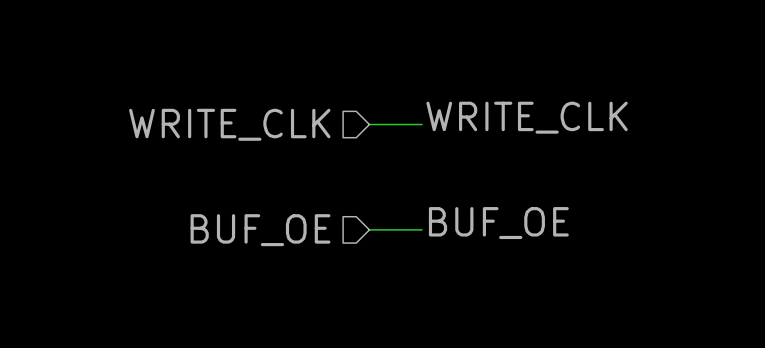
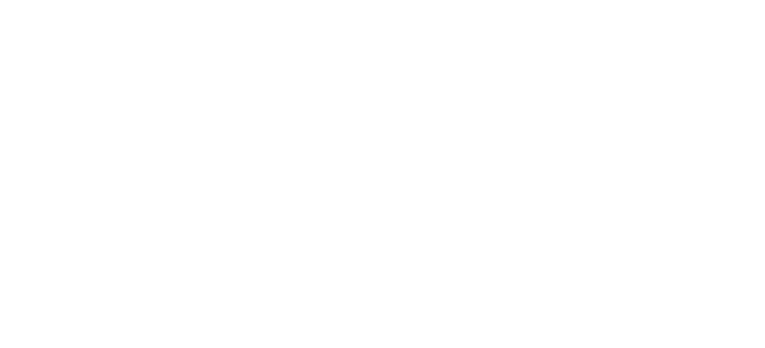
label: WRITE_CLK (527, 117) -> none
hierarchical label: WRITE_CLK (229, 124) -> none
wire: (369, 124) (422, 124) -> none
label: BUF_OE (498, 223) -> none
wire: (369, 229) (422, 229) -> none
hierarchical label: BUF_OE (260, 230) -> none

